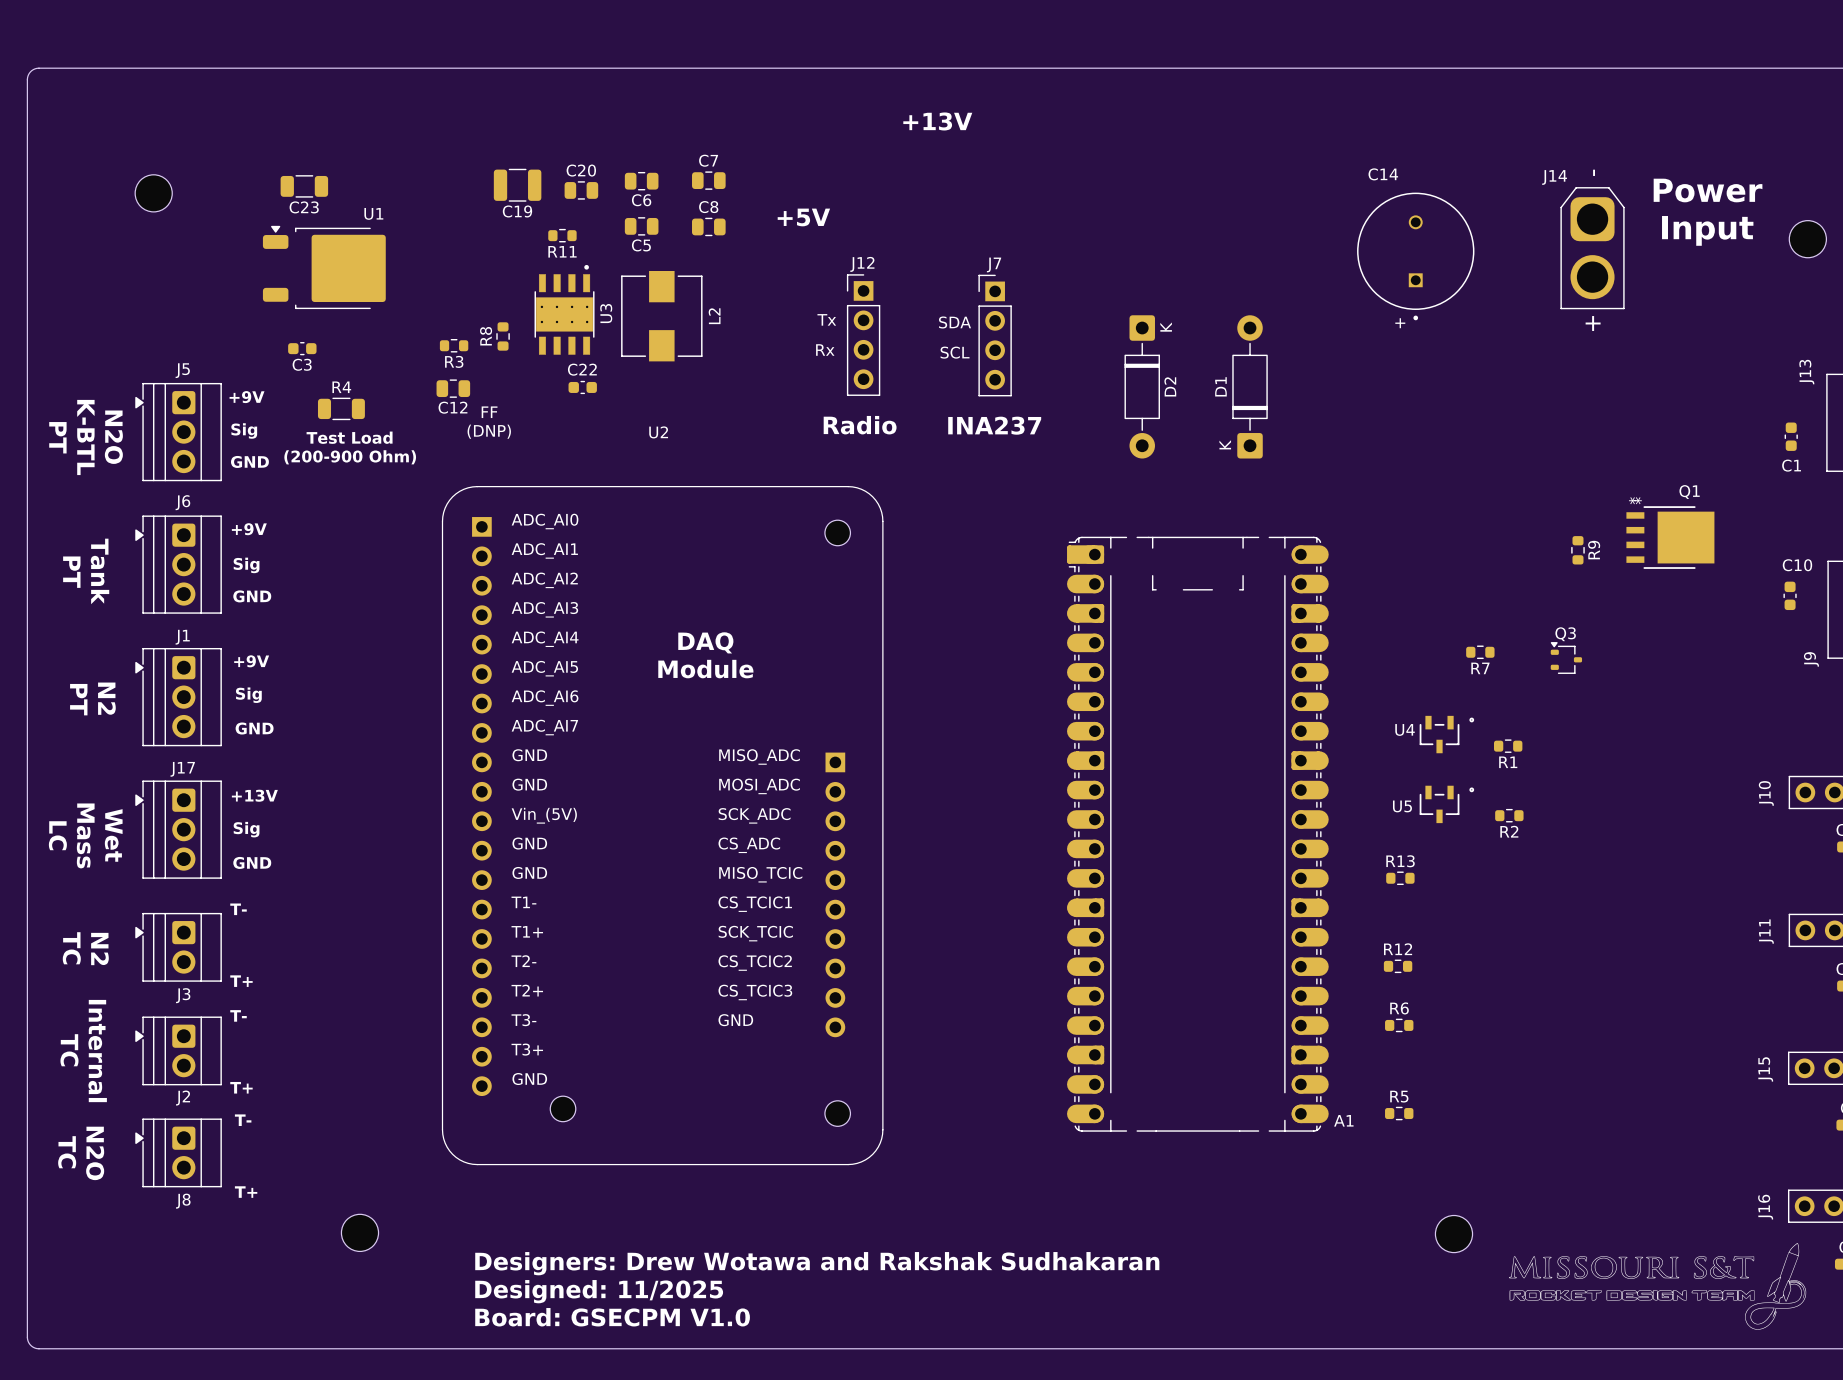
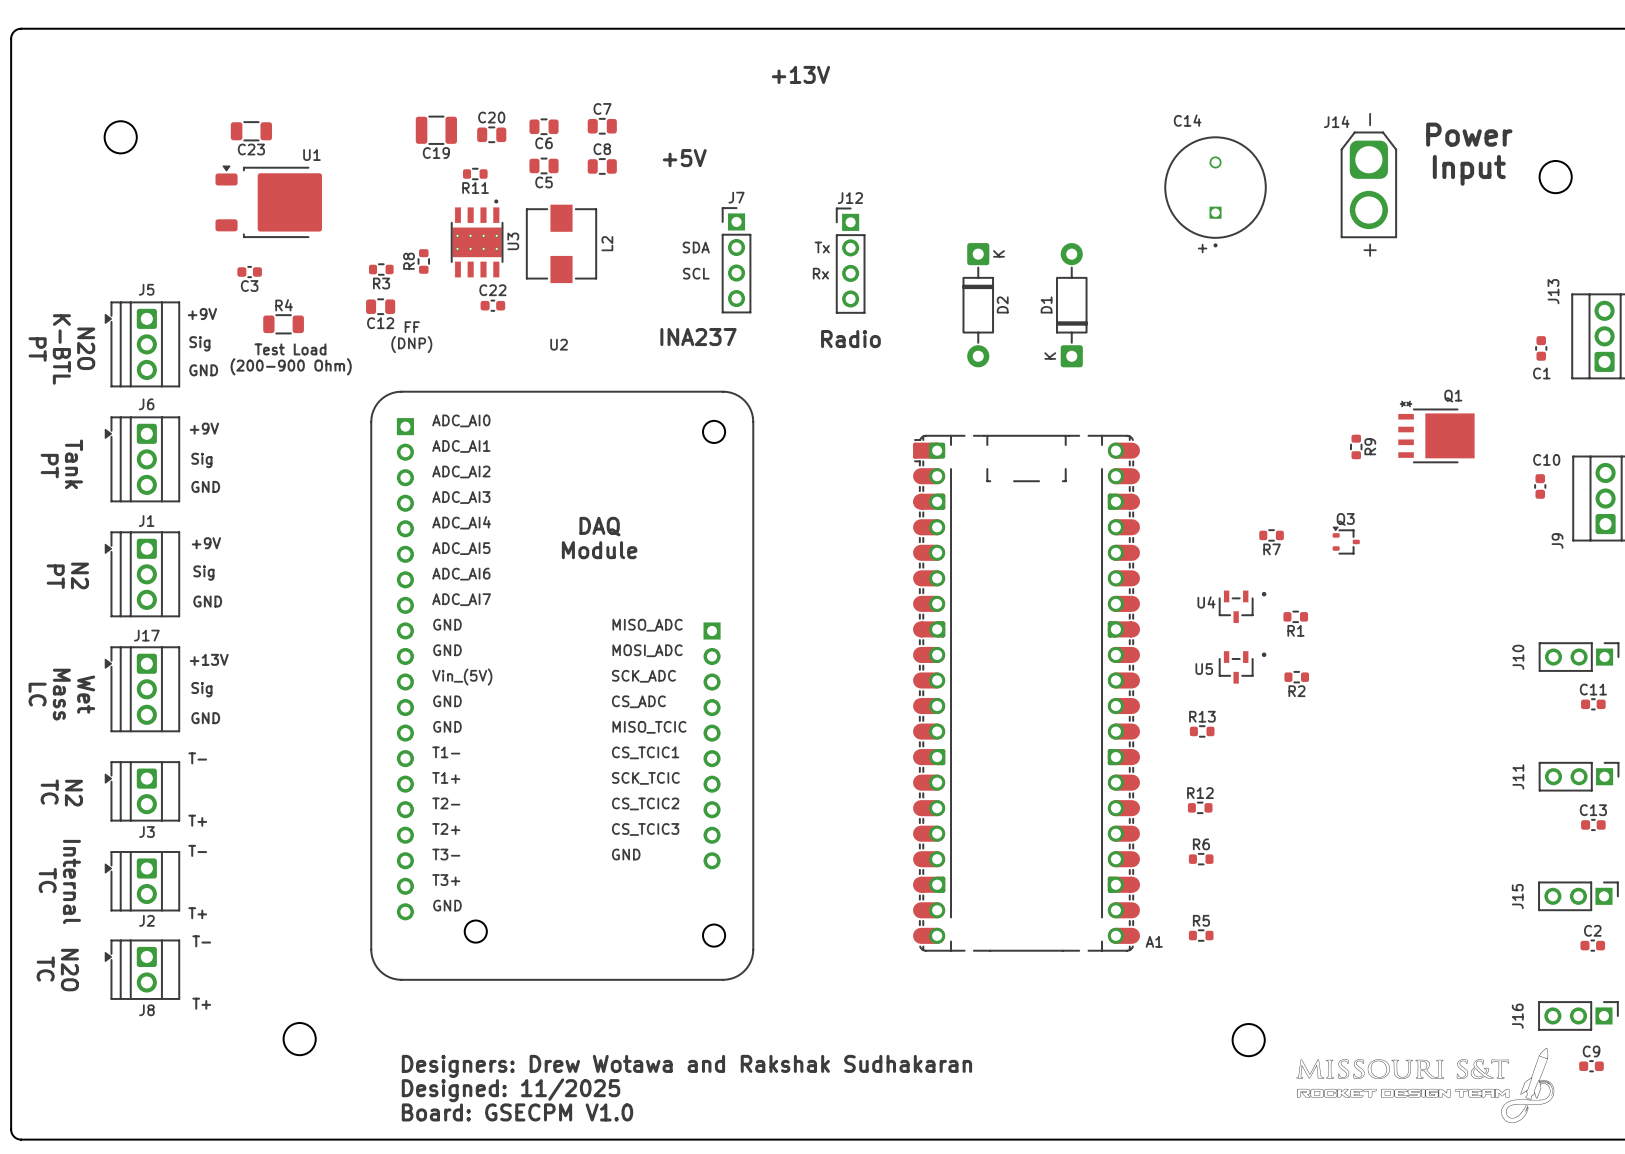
J12 name: J12 (862, 264) -> J7 (736, 197)
J7 name: J7 (994, 264) -> J12 (850, 198)
text: Tx (826, 319) -> SDA (696, 247)
text: SDA (955, 322) -> Tx (822, 247)
text: Rx (825, 350) -> SCL (696, 273)
text: SCL (955, 352) -> Rx (820, 273)
text: none -> INA237 (698, 337)
text: Radio (860, 425) -> none
text: INA237 (994, 425) -> Radio (850, 339)

